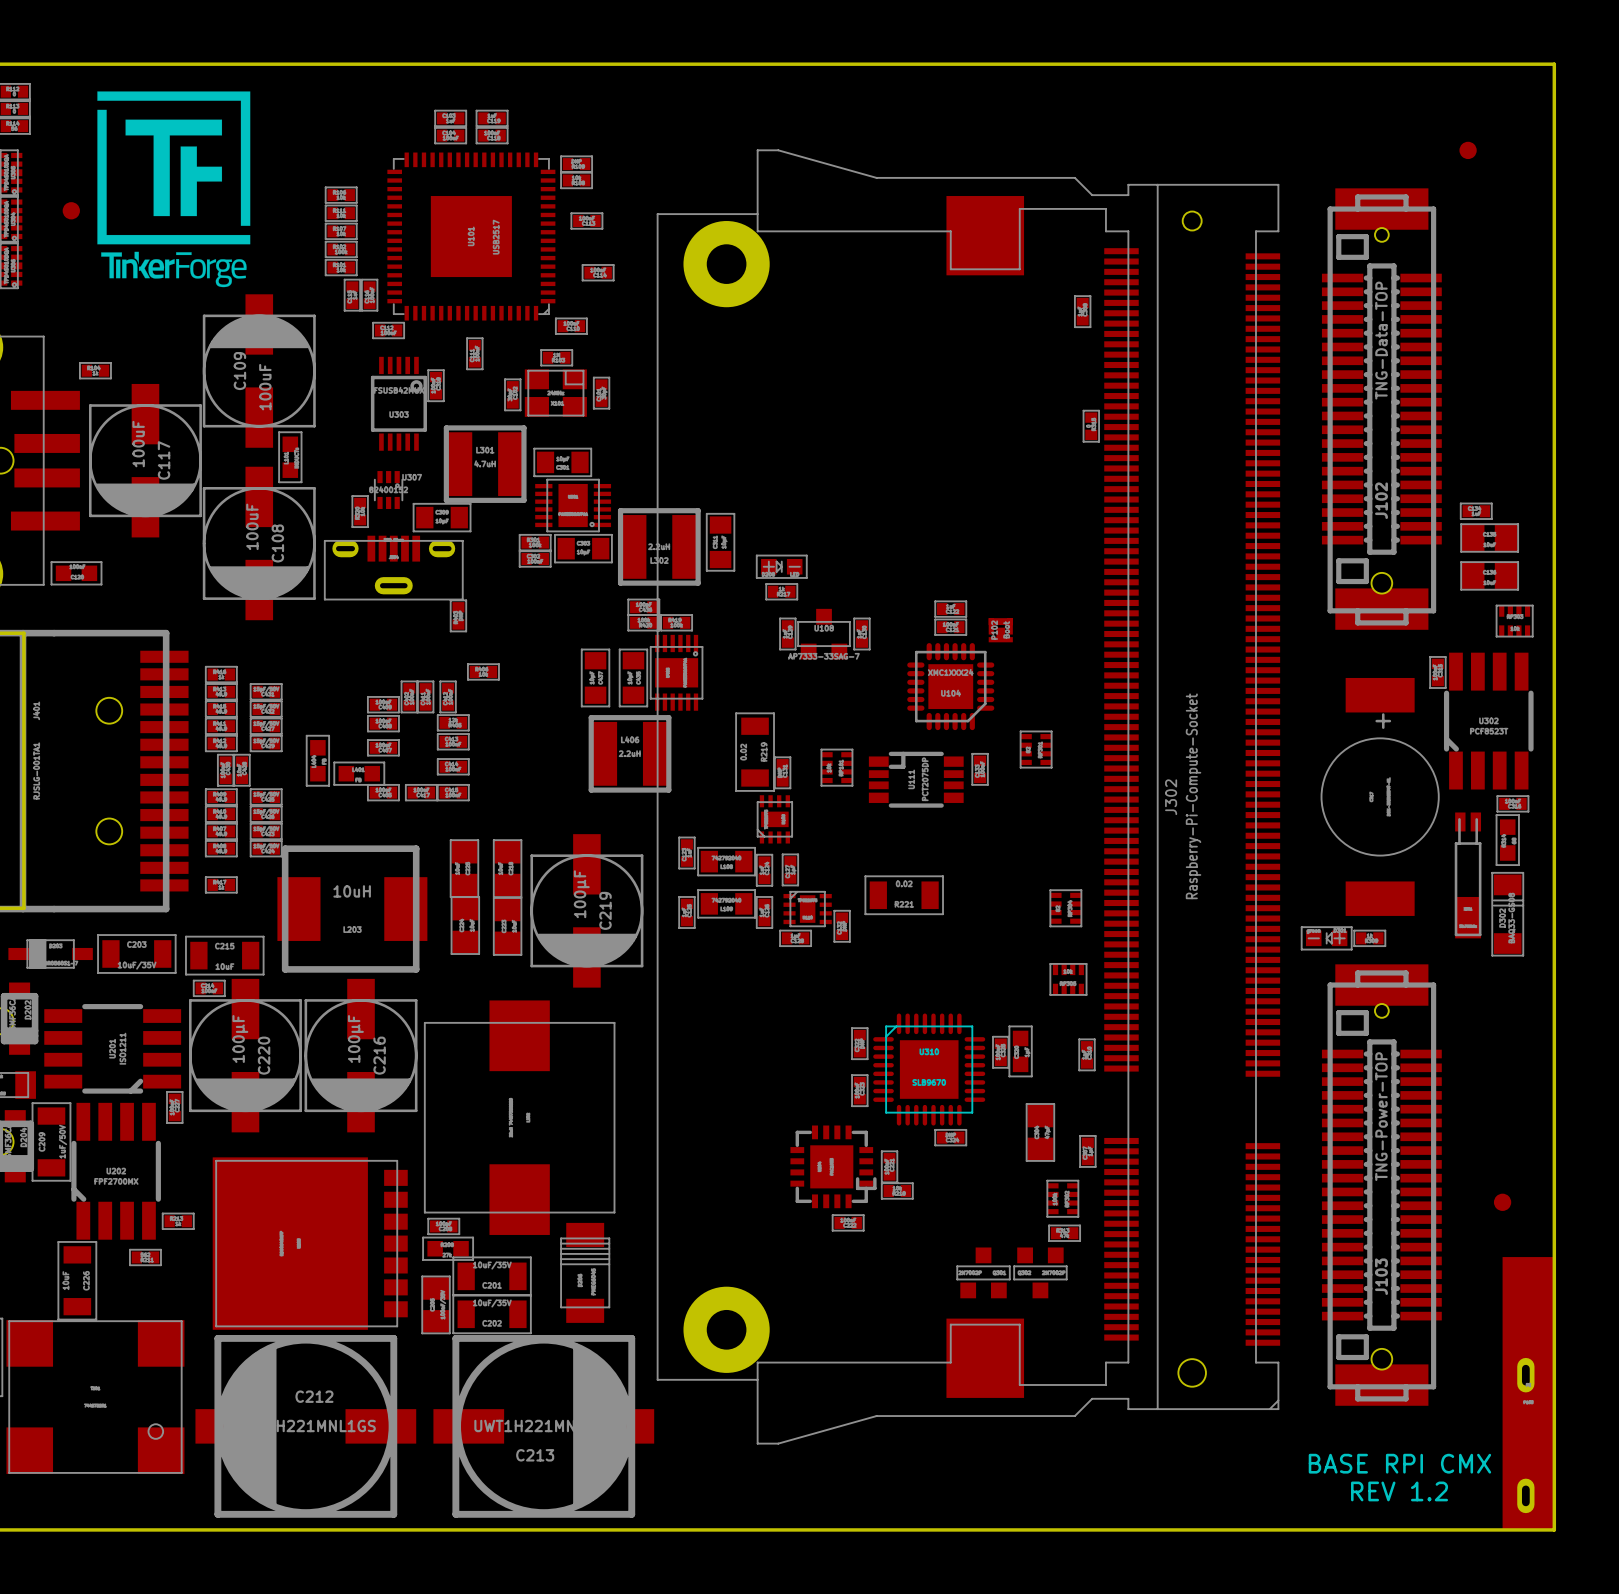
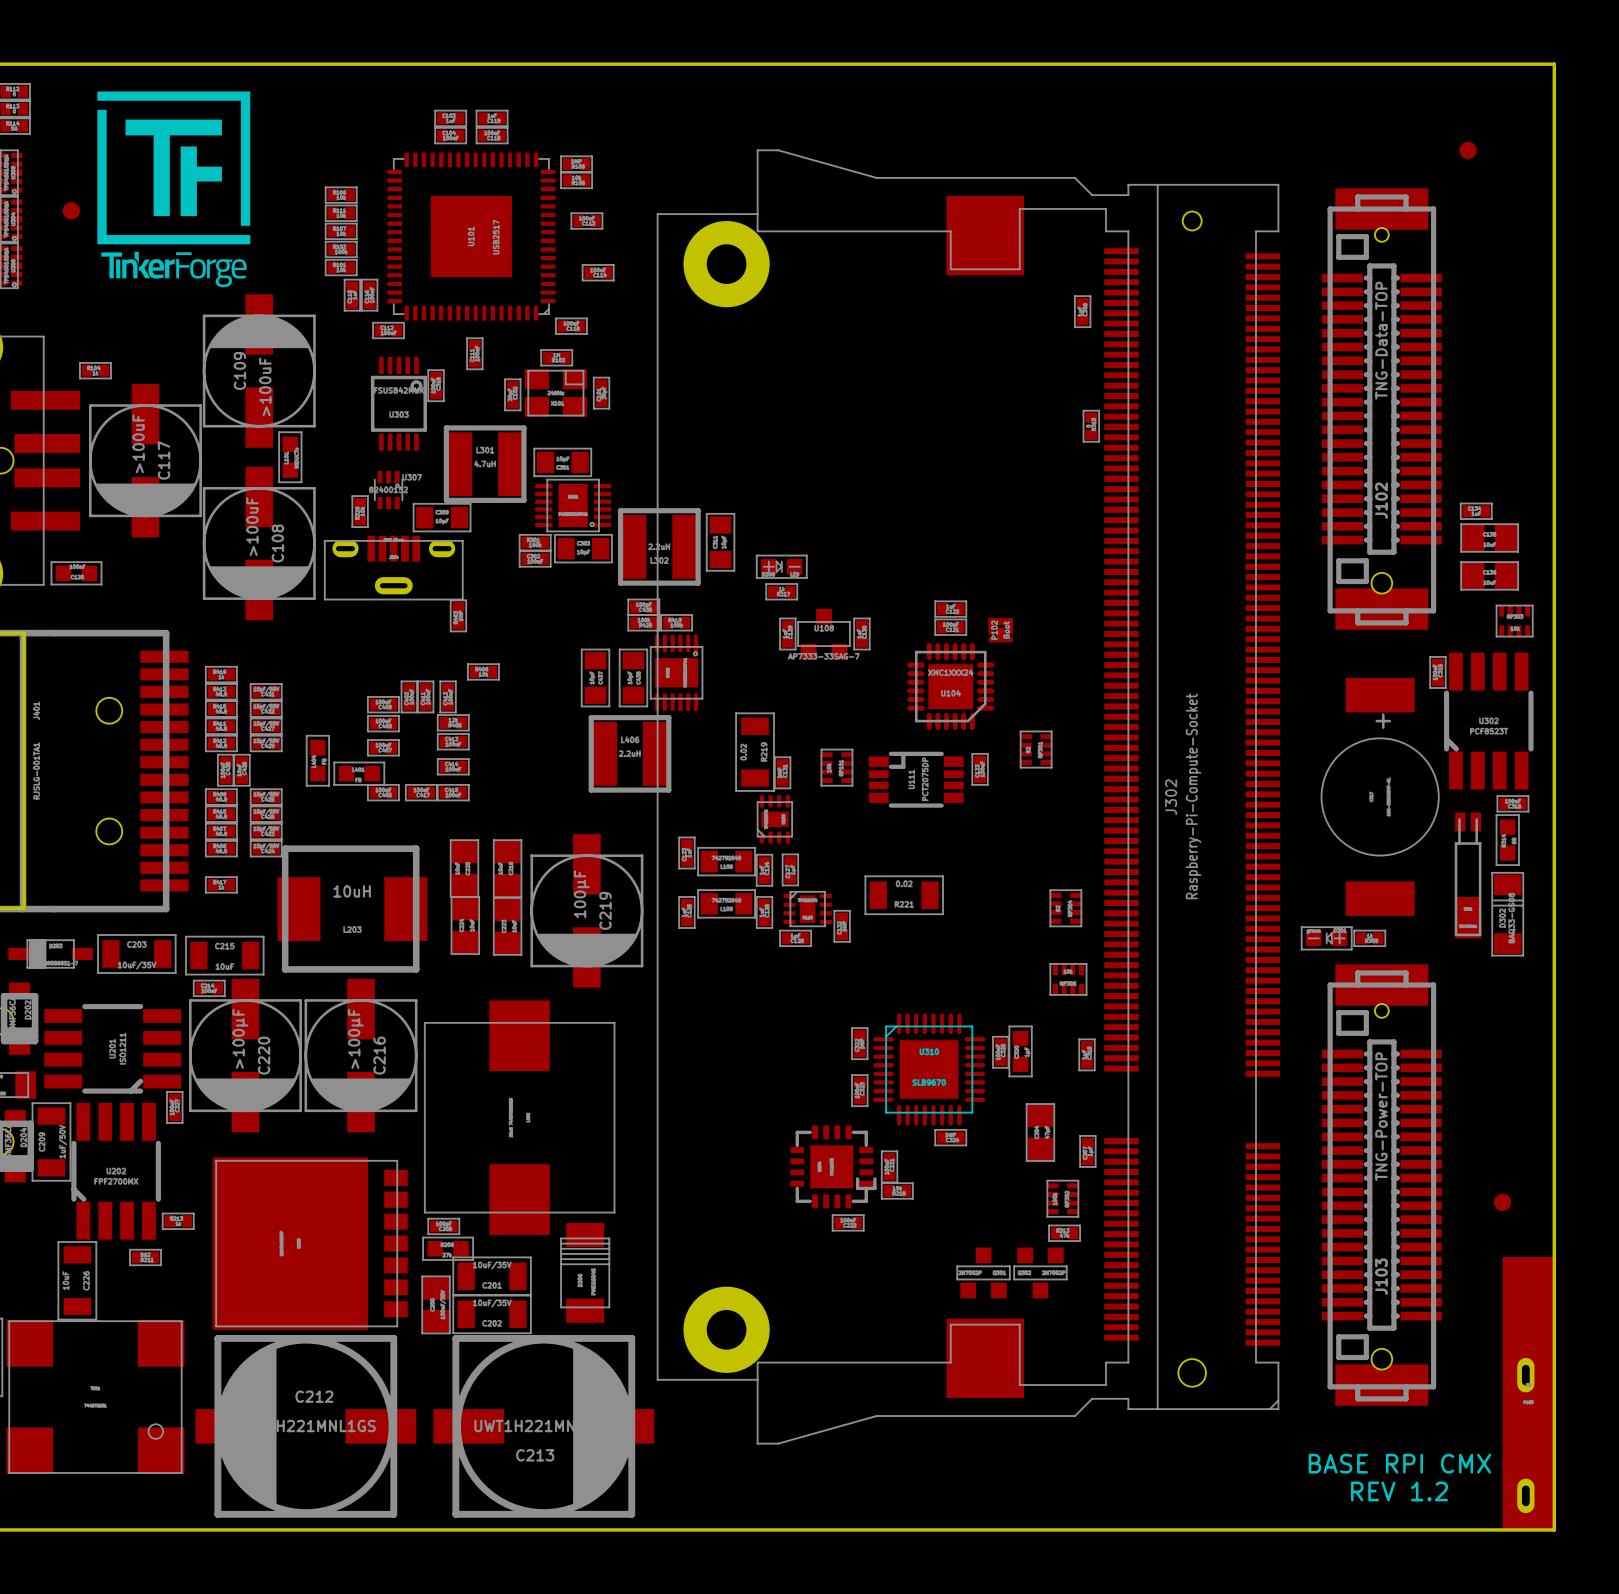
C109 value: 100uF (265, 387) -> >100uF (265, 386)
C117 value: 100uF (138, 444) -> >100uF (138, 443)
C108 value: 100uF (252, 526) -> >100uF (252, 526)
C220 value: 100µF (240, 1039) -> >100µF (240, 1038)
C216 value: 100µF (355, 1039) -> >100µF (355, 1038)

